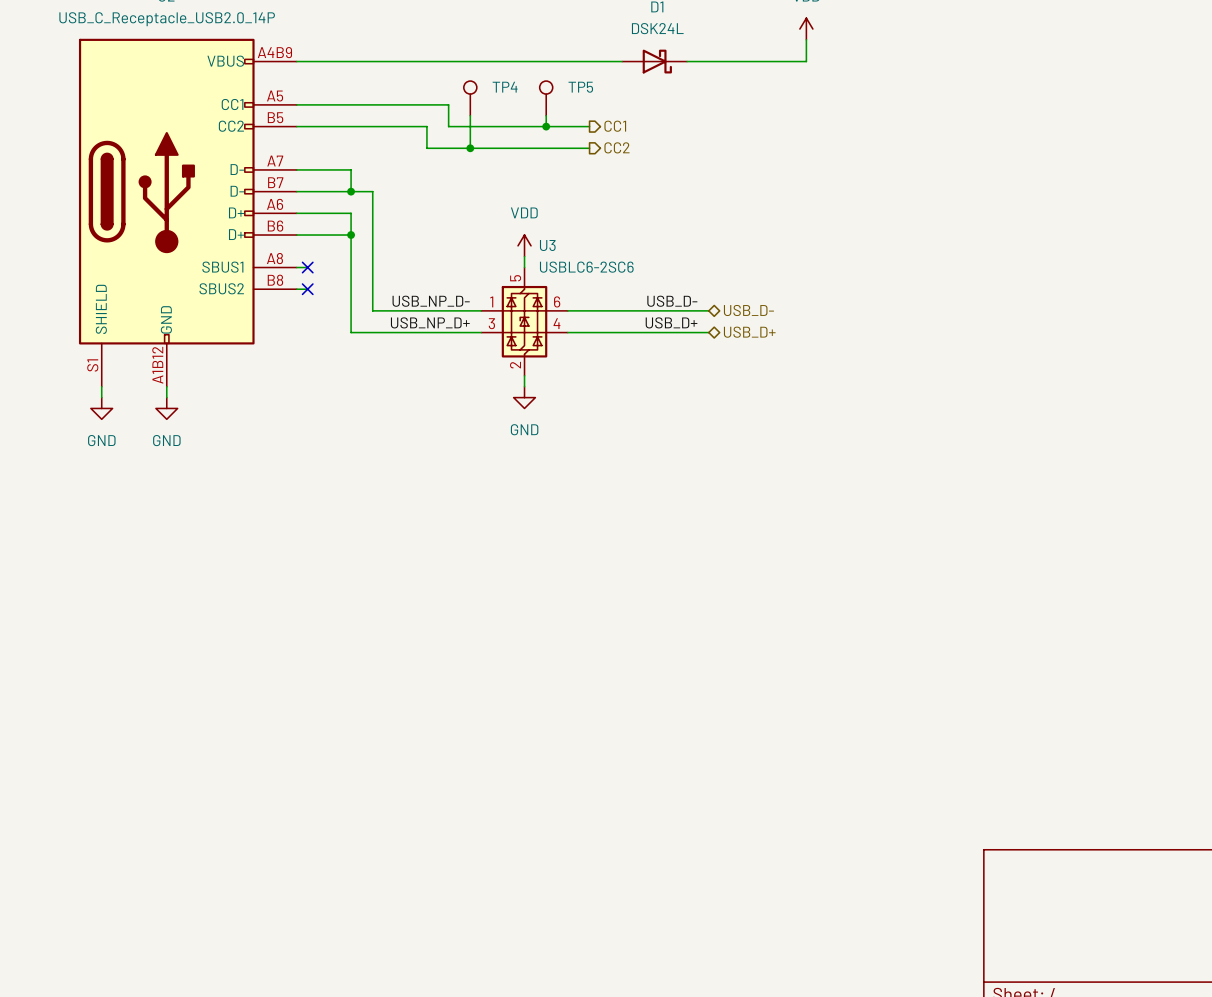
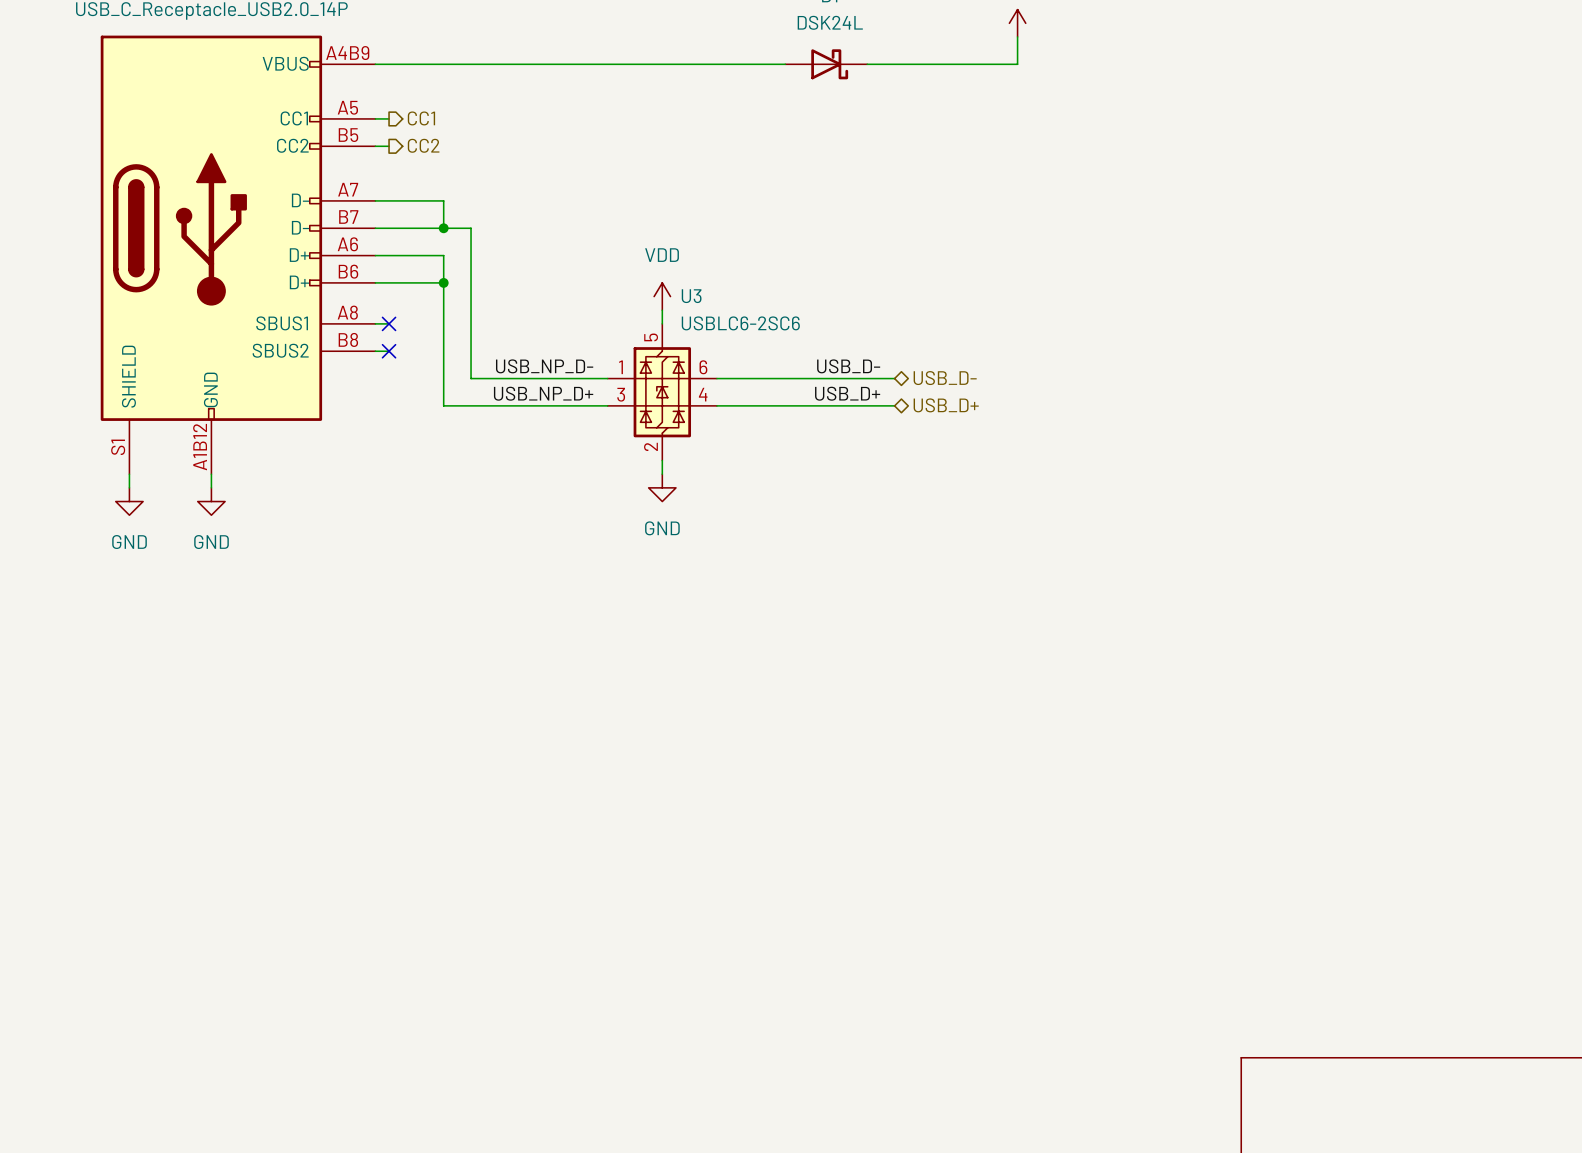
TP4: (470, 98) -> none
TP5: (546, 98) -> none
wire: (307, 104) (448, 104) (448, 126) (589, 126) -> none
hierarchical label: none -> CC1 (421, 118)
wire: (470, 115) (470, 148) -> none
wire: (546, 115) (546, 126) -> none
wire: (307, 126) (426, 126) (426, 148) (589, 148) -> none
hierarchical label: none -> CC2 (423, 145)
junction: (546, 126) -> none
hierarchical label: CC1 (615, 126) -> none
hierarchical label: CC2 (616, 147) -> none
junction: (470, 148) -> none

